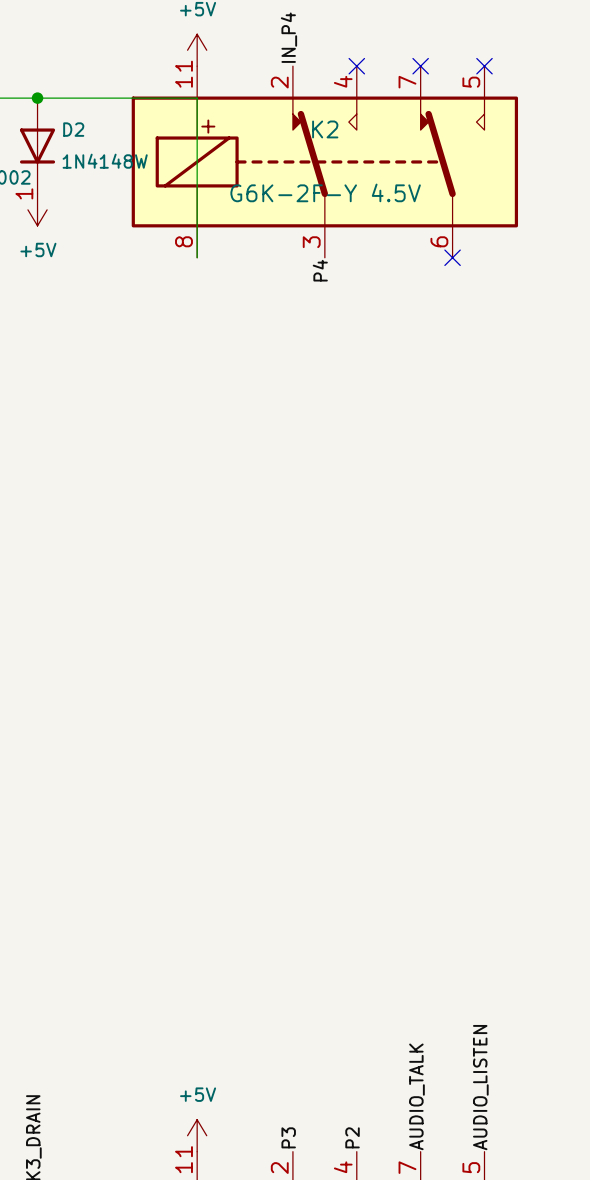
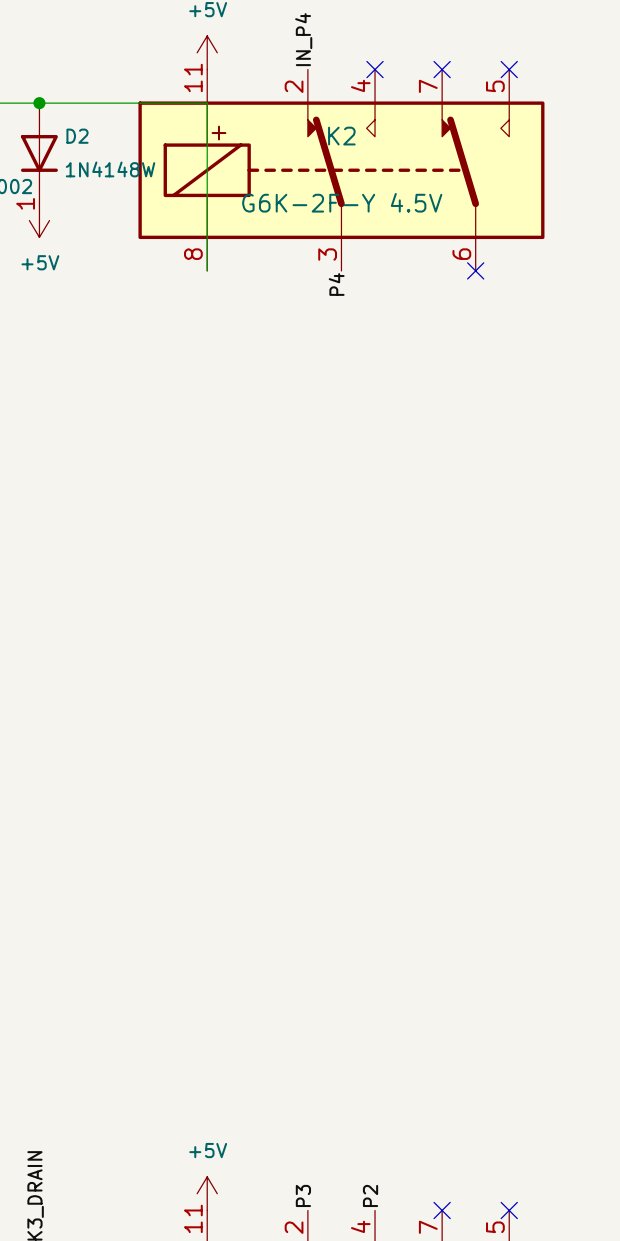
label: AUDIO_LISTEN (480, 1087) -> none
label: AUDIO_TALK (416, 1096) -> none
no-connect mark: none -> (442, 1210)
no-connect mark: none -> (509, 1210)

